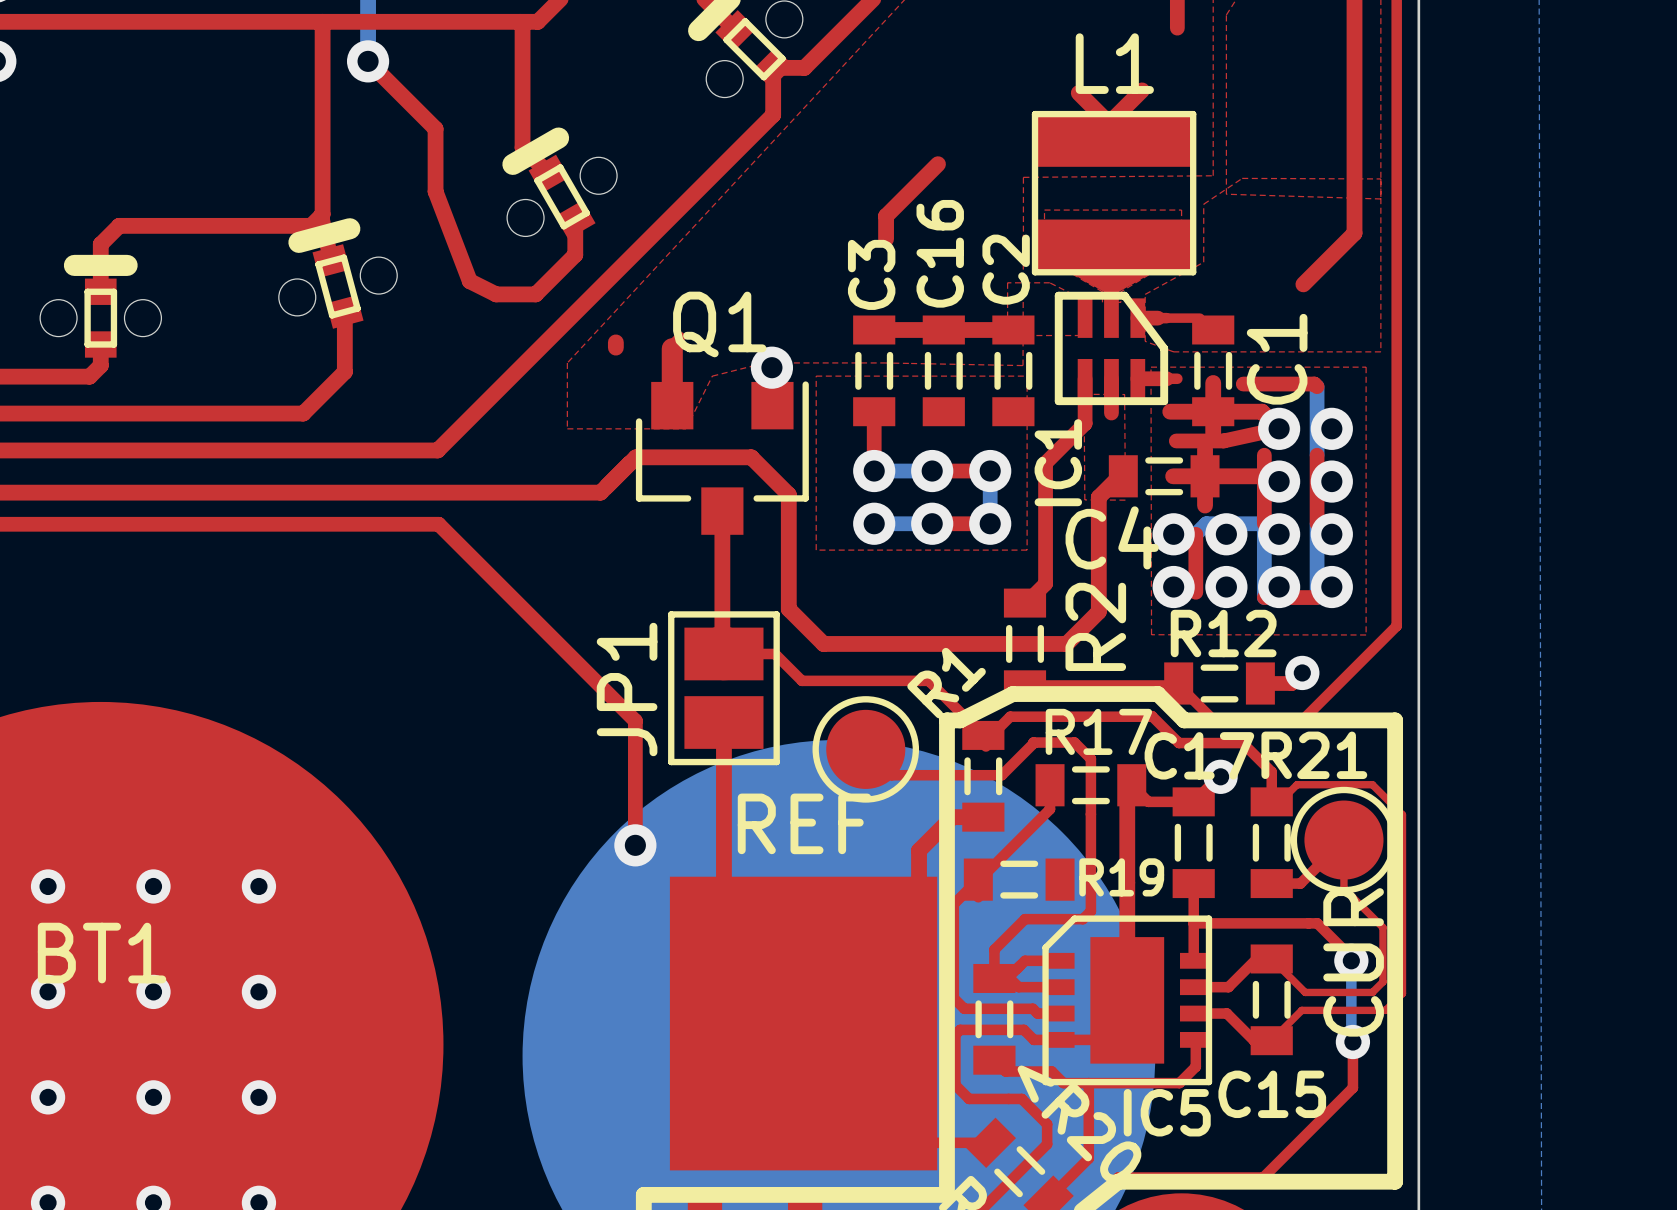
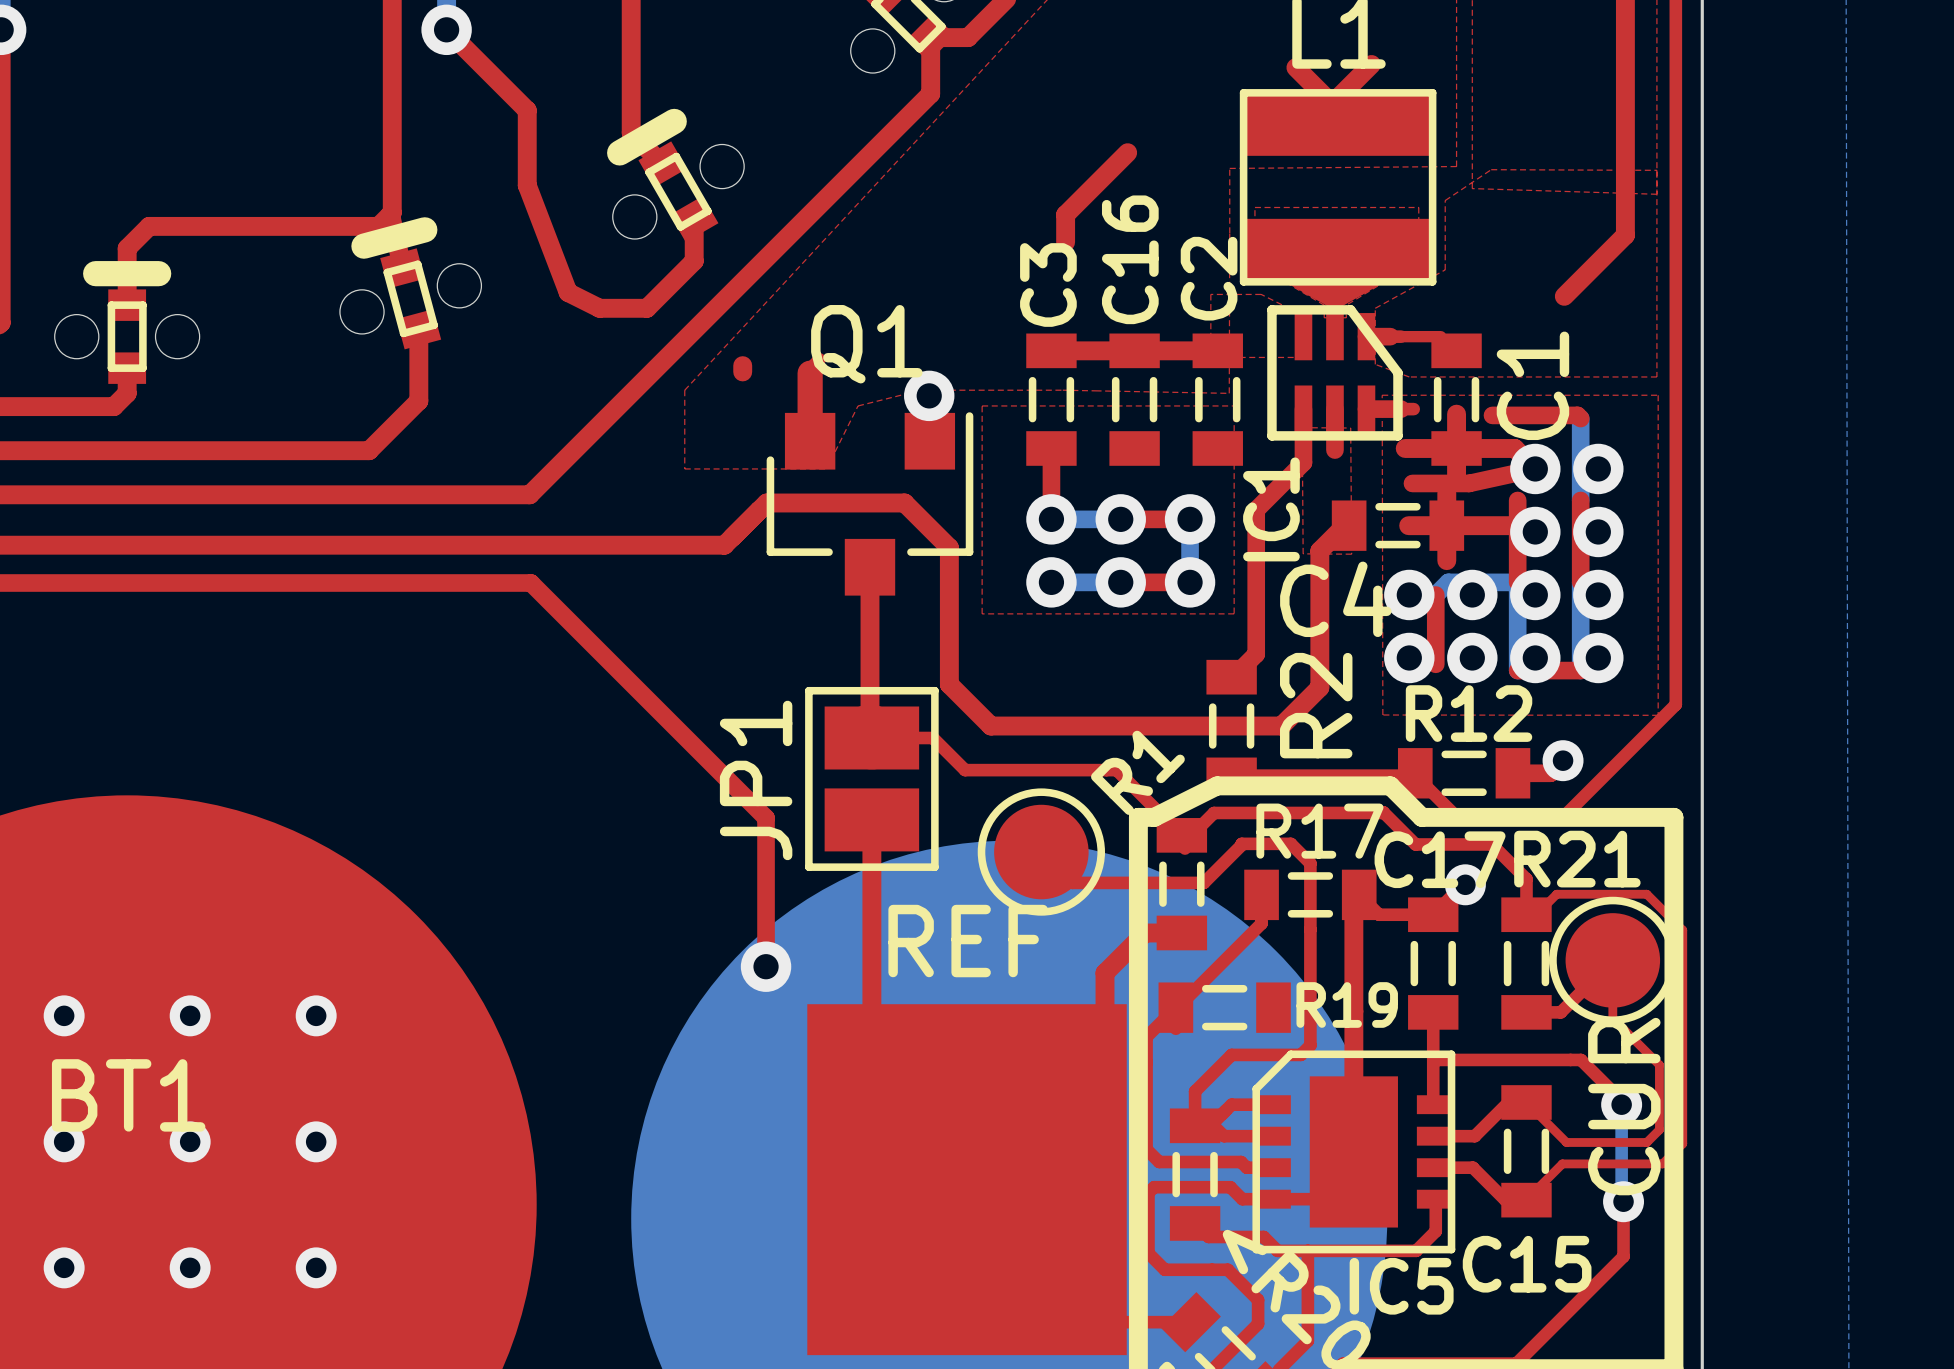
top zone outline: (1366, 367) (1366, 634) (1151, 634) -> (1639, 395) (1658, 395) (1658, 715) (1382, 715)

